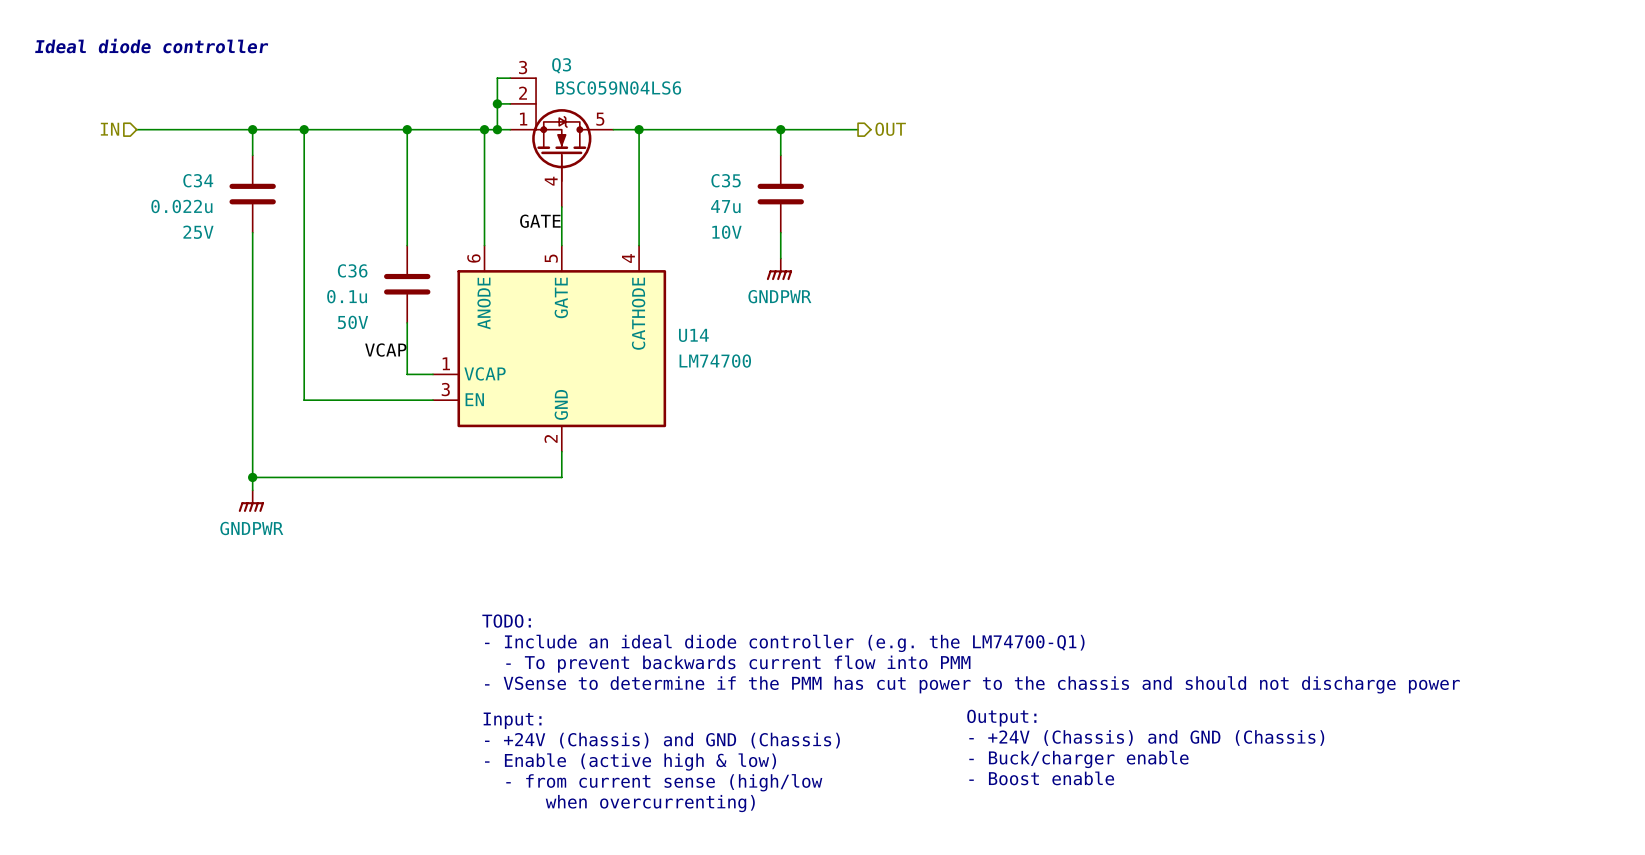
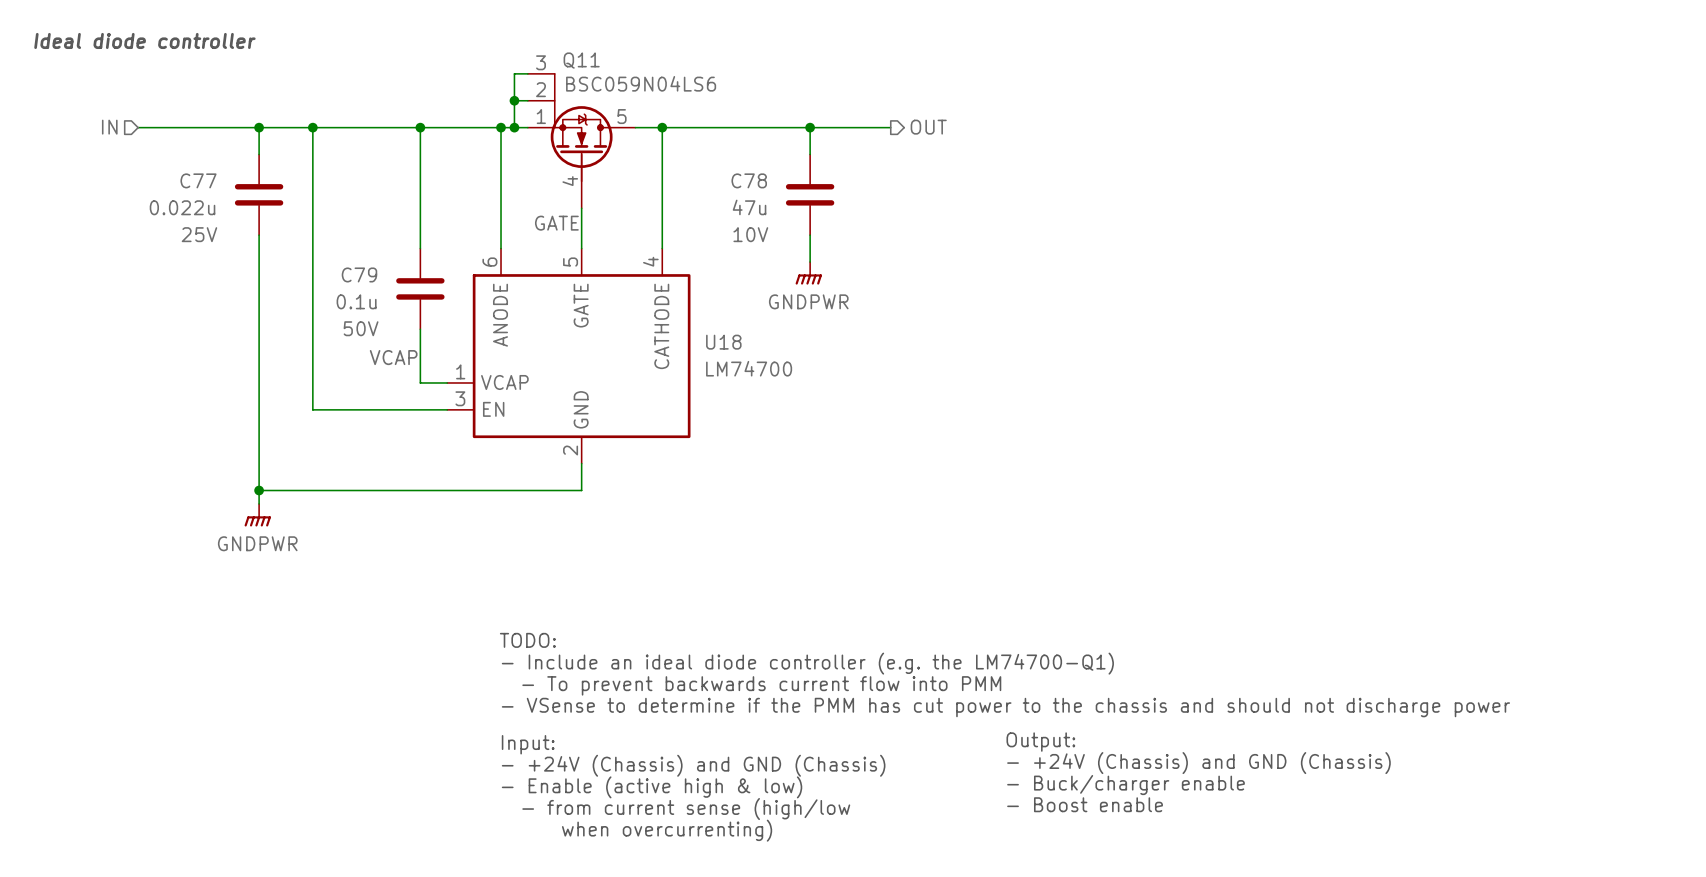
Q3 name: Q3 (561, 65) -> Q11 (581, 60)
C34 name: C34 (198, 180) -> C77 (198, 180)
C35 name: C35 (726, 180) -> C78 (749, 180)
C36 name: C36 (352, 270) -> C79 (359, 274)
U14 name: U14 (693, 335) -> U18 (723, 342)

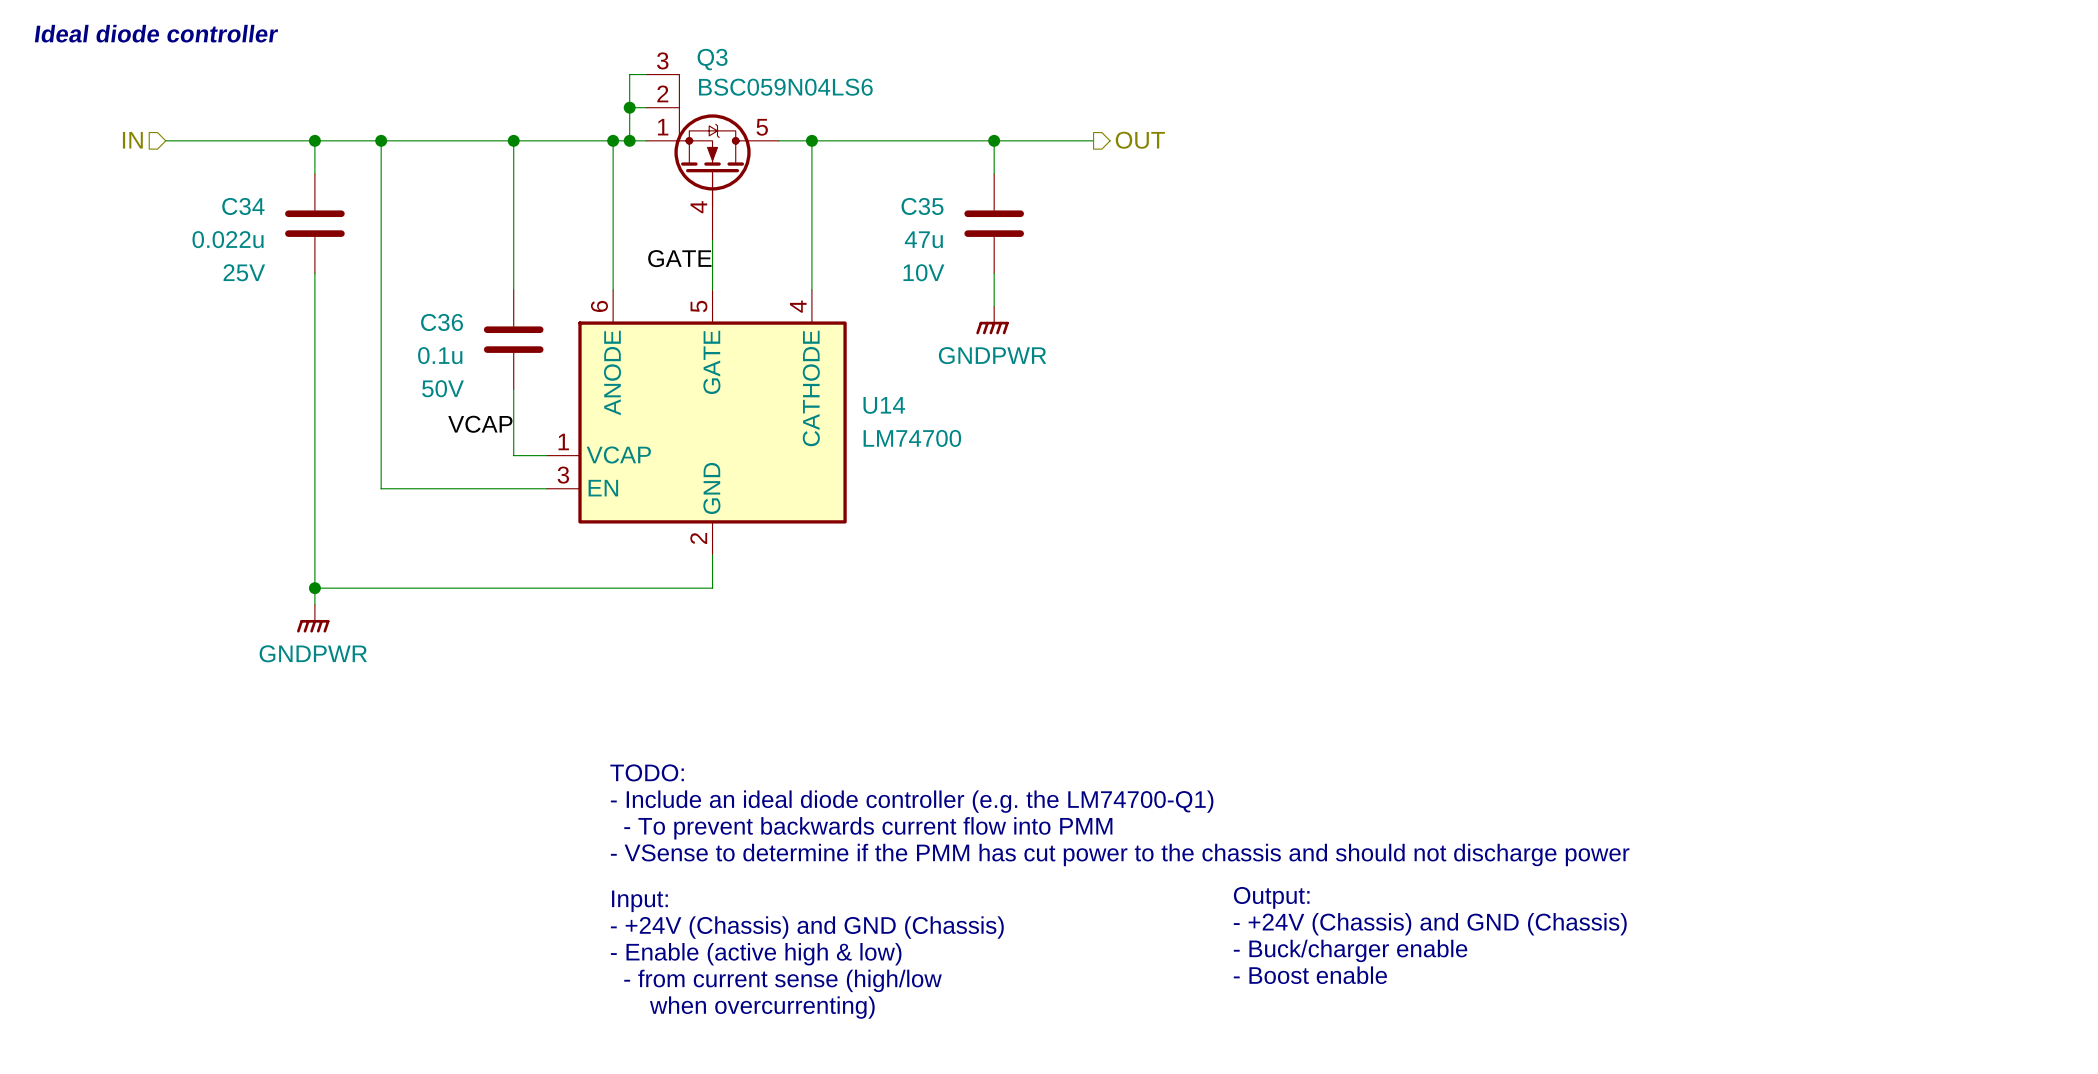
Q11 name: Q11 (581, 60) -> Q3 (712, 59)
C77 name: C77 (198, 180) -> C34 (243, 206)
C78 name: C78 (749, 180) -> C35 (922, 206)
C79 name: C79 (359, 274) -> C36 (442, 322)
U18 name: U18 (723, 342) -> U14 (884, 405)

